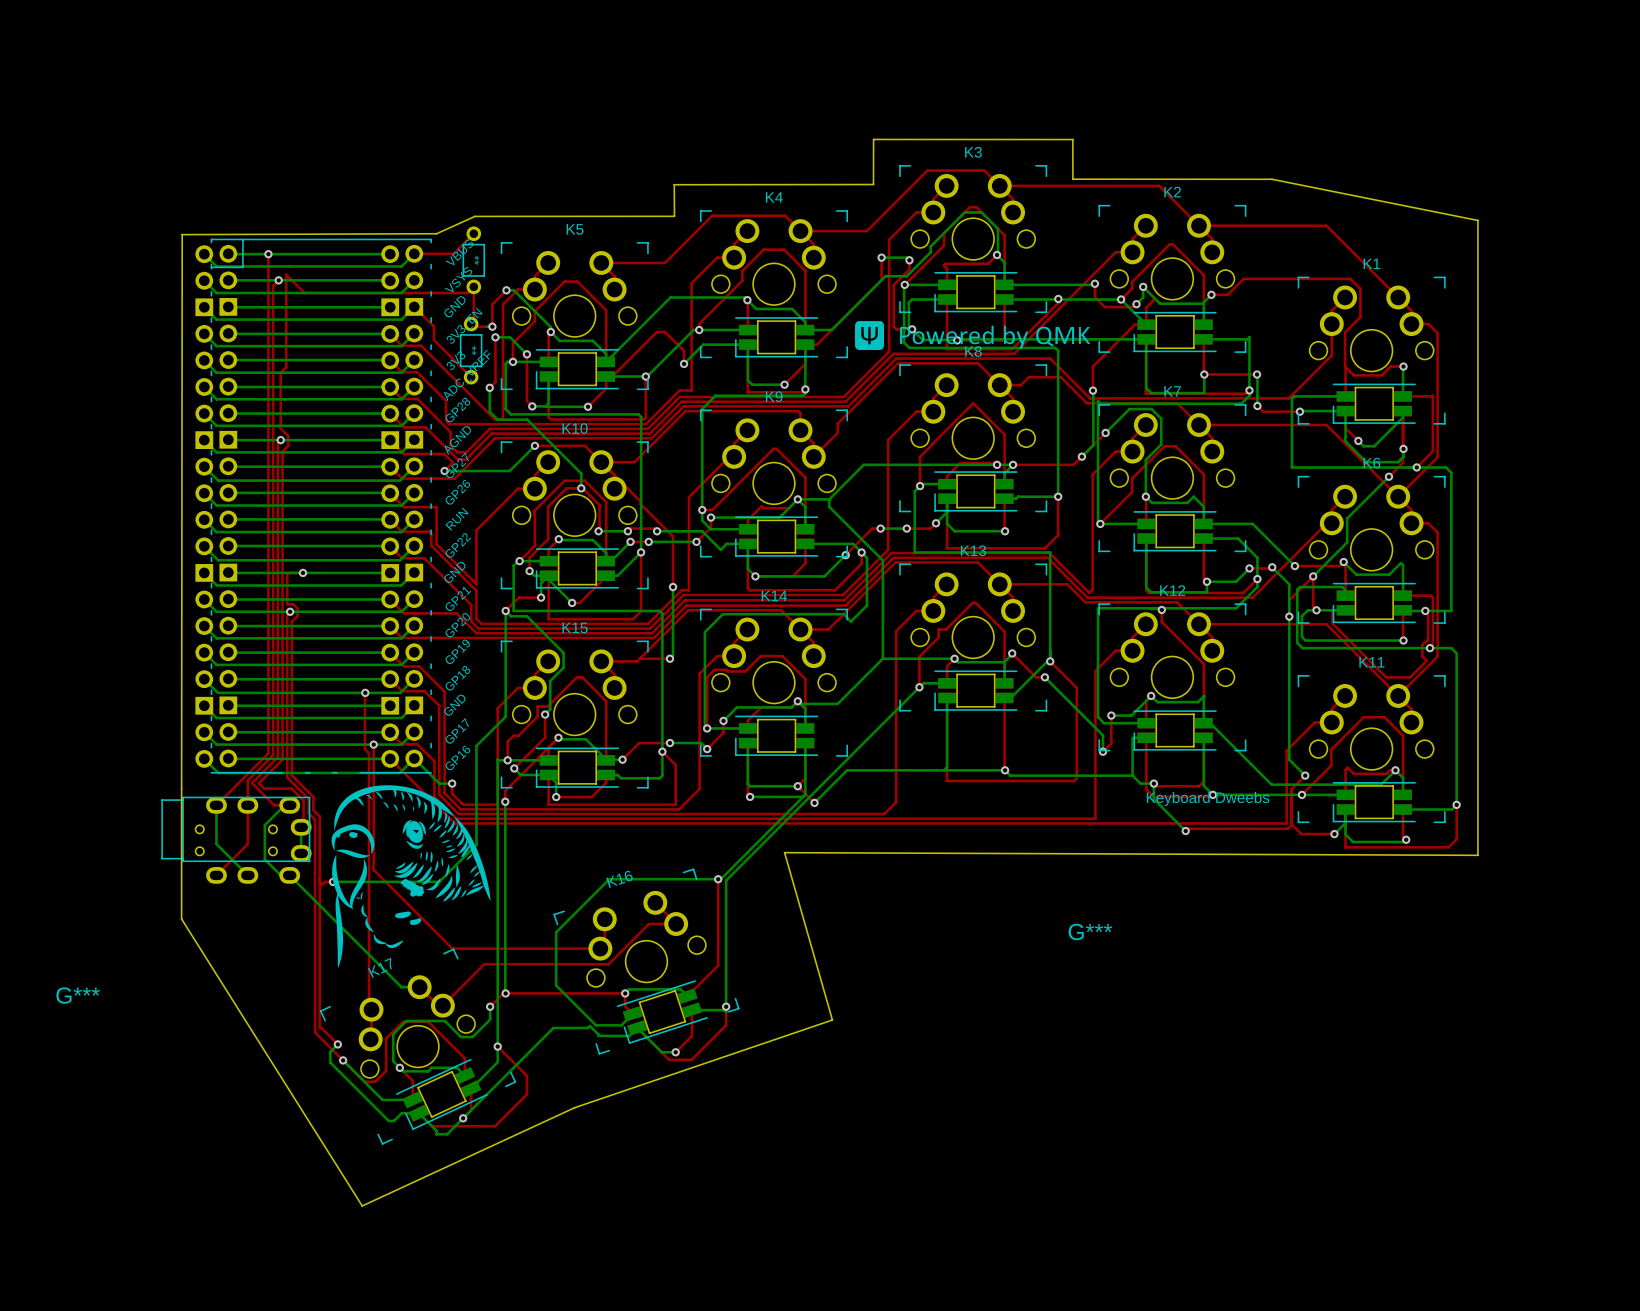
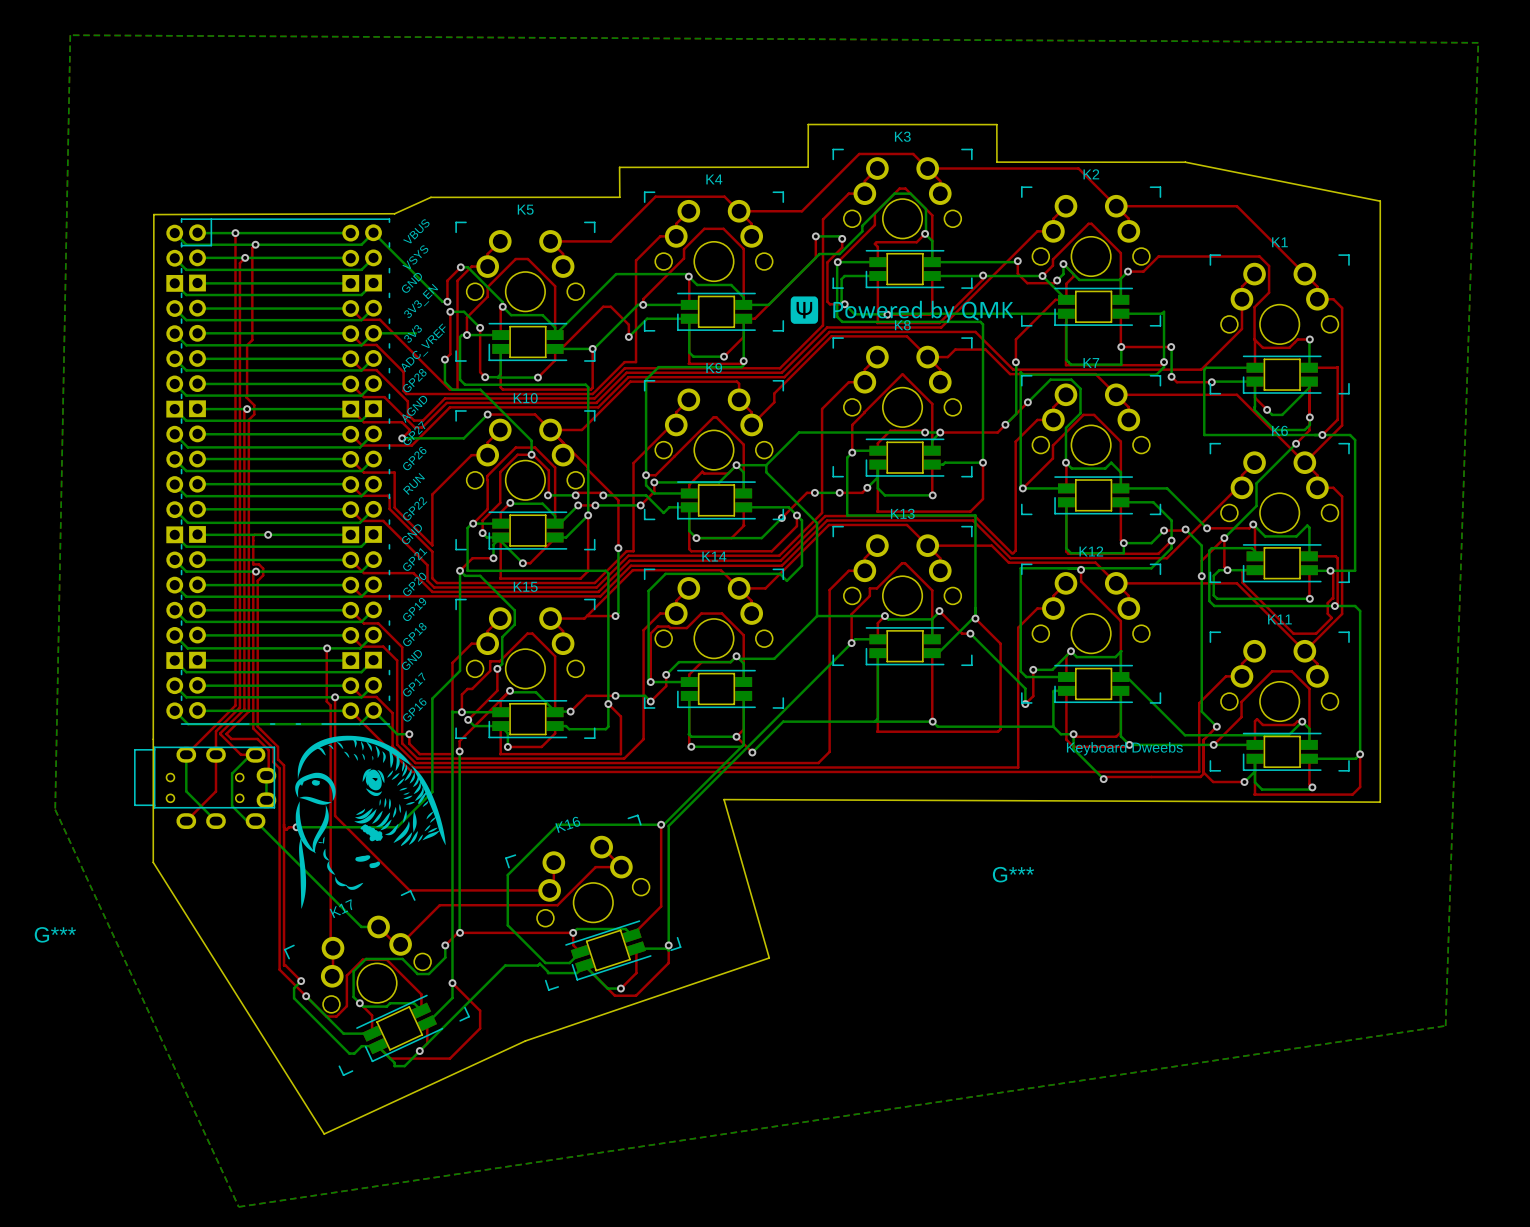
bottom zone outline: none -> (70, 35) (1478, 42) (1445, 1025) (238, 1206) (55, 809) (70, 35)
top track: (473, 233) (453, 253) (414, 253) -> none
bottom track: none -> (373, 232) (442, 301)
part: (473, 260) -> none
via: none -> (255, 244)
top track: (286, 274) (304, 293) (467, 293) (473, 286) (473, 321) (471, 324) (473, 326) (492, 326) -> (252, 252) (252, 247) (255, 244)
top track: (414, 306) (433, 326) (433, 339) (471, 377) -> none
part: (471, 350) -> none
bottom track: none -> (415, 333) (373, 333)

